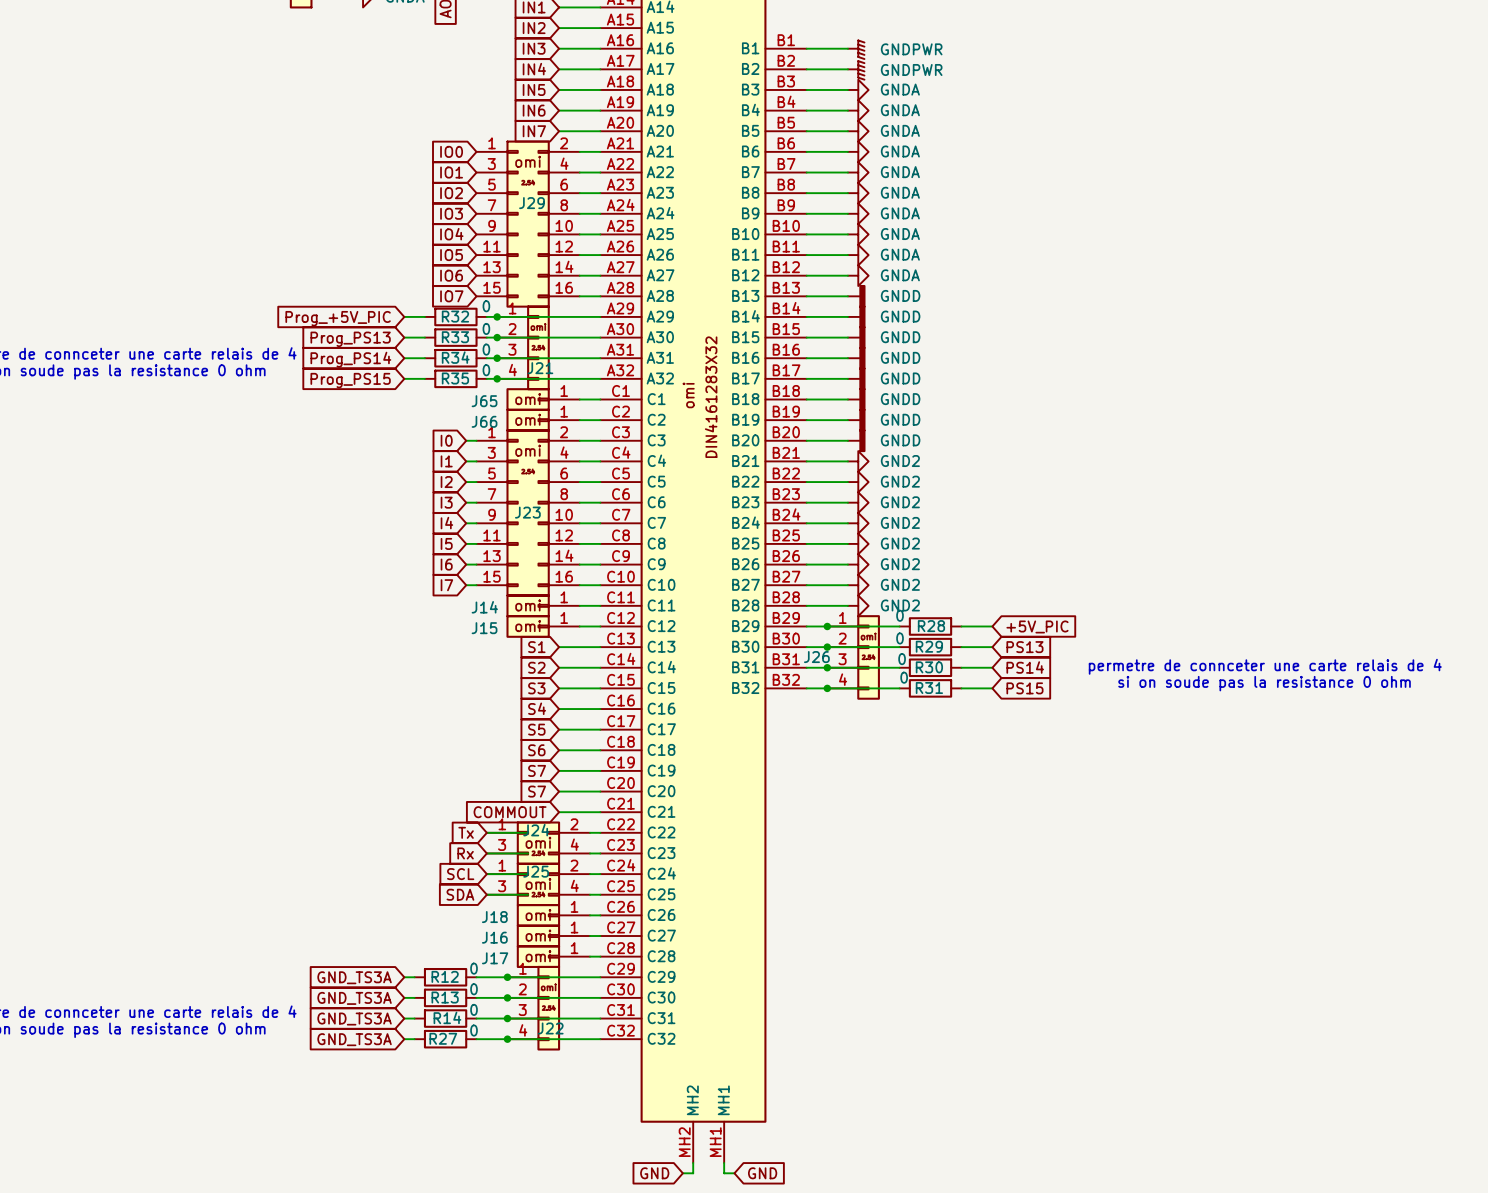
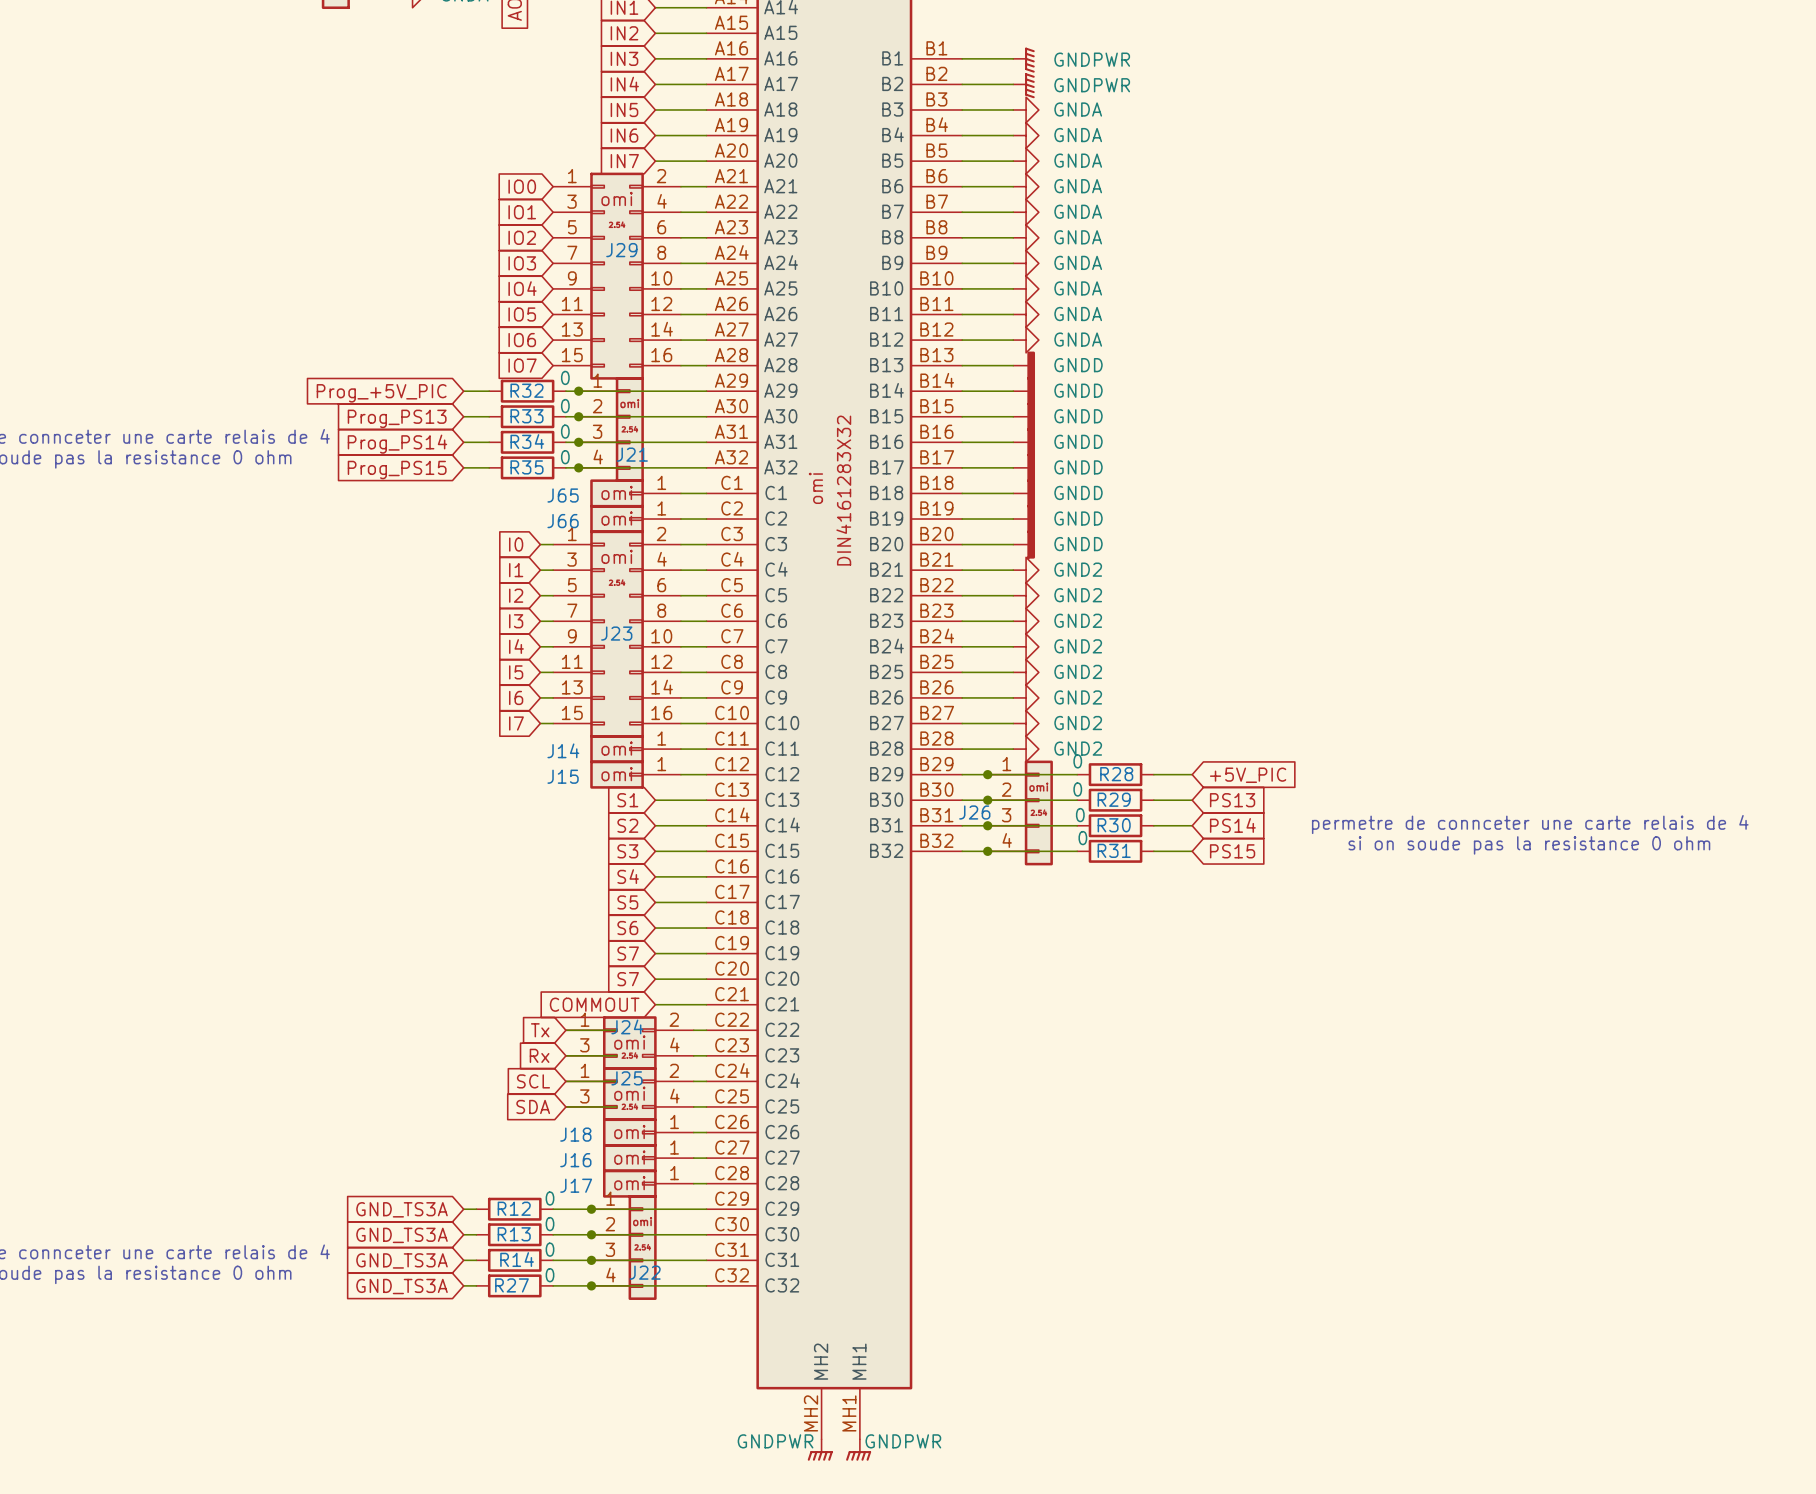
power symbol: none -> GNDPWR (820, 1450)
power symbol: none -> GNDPWR (858, 1450)
global label: GND (654, 1173) -> none
global label: GND (762, 1173) -> none

